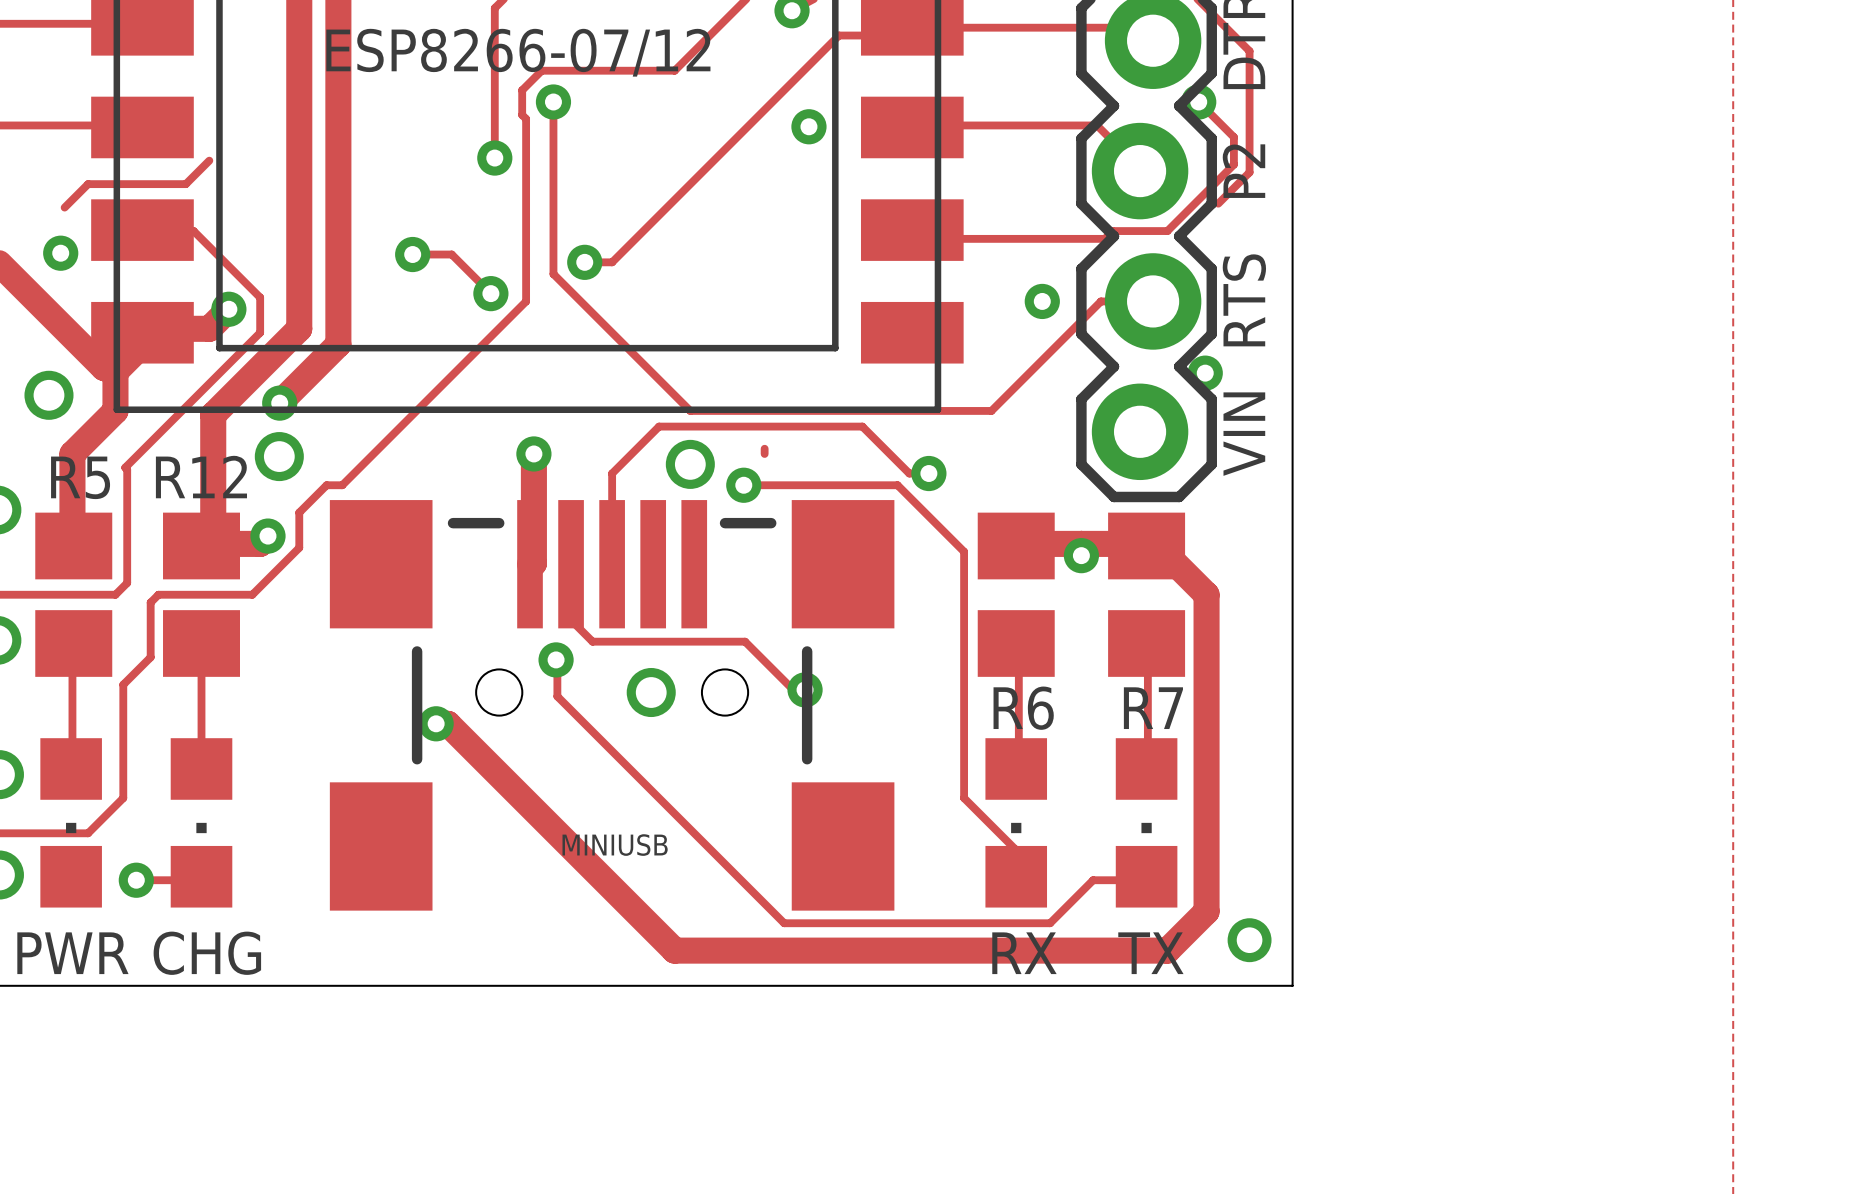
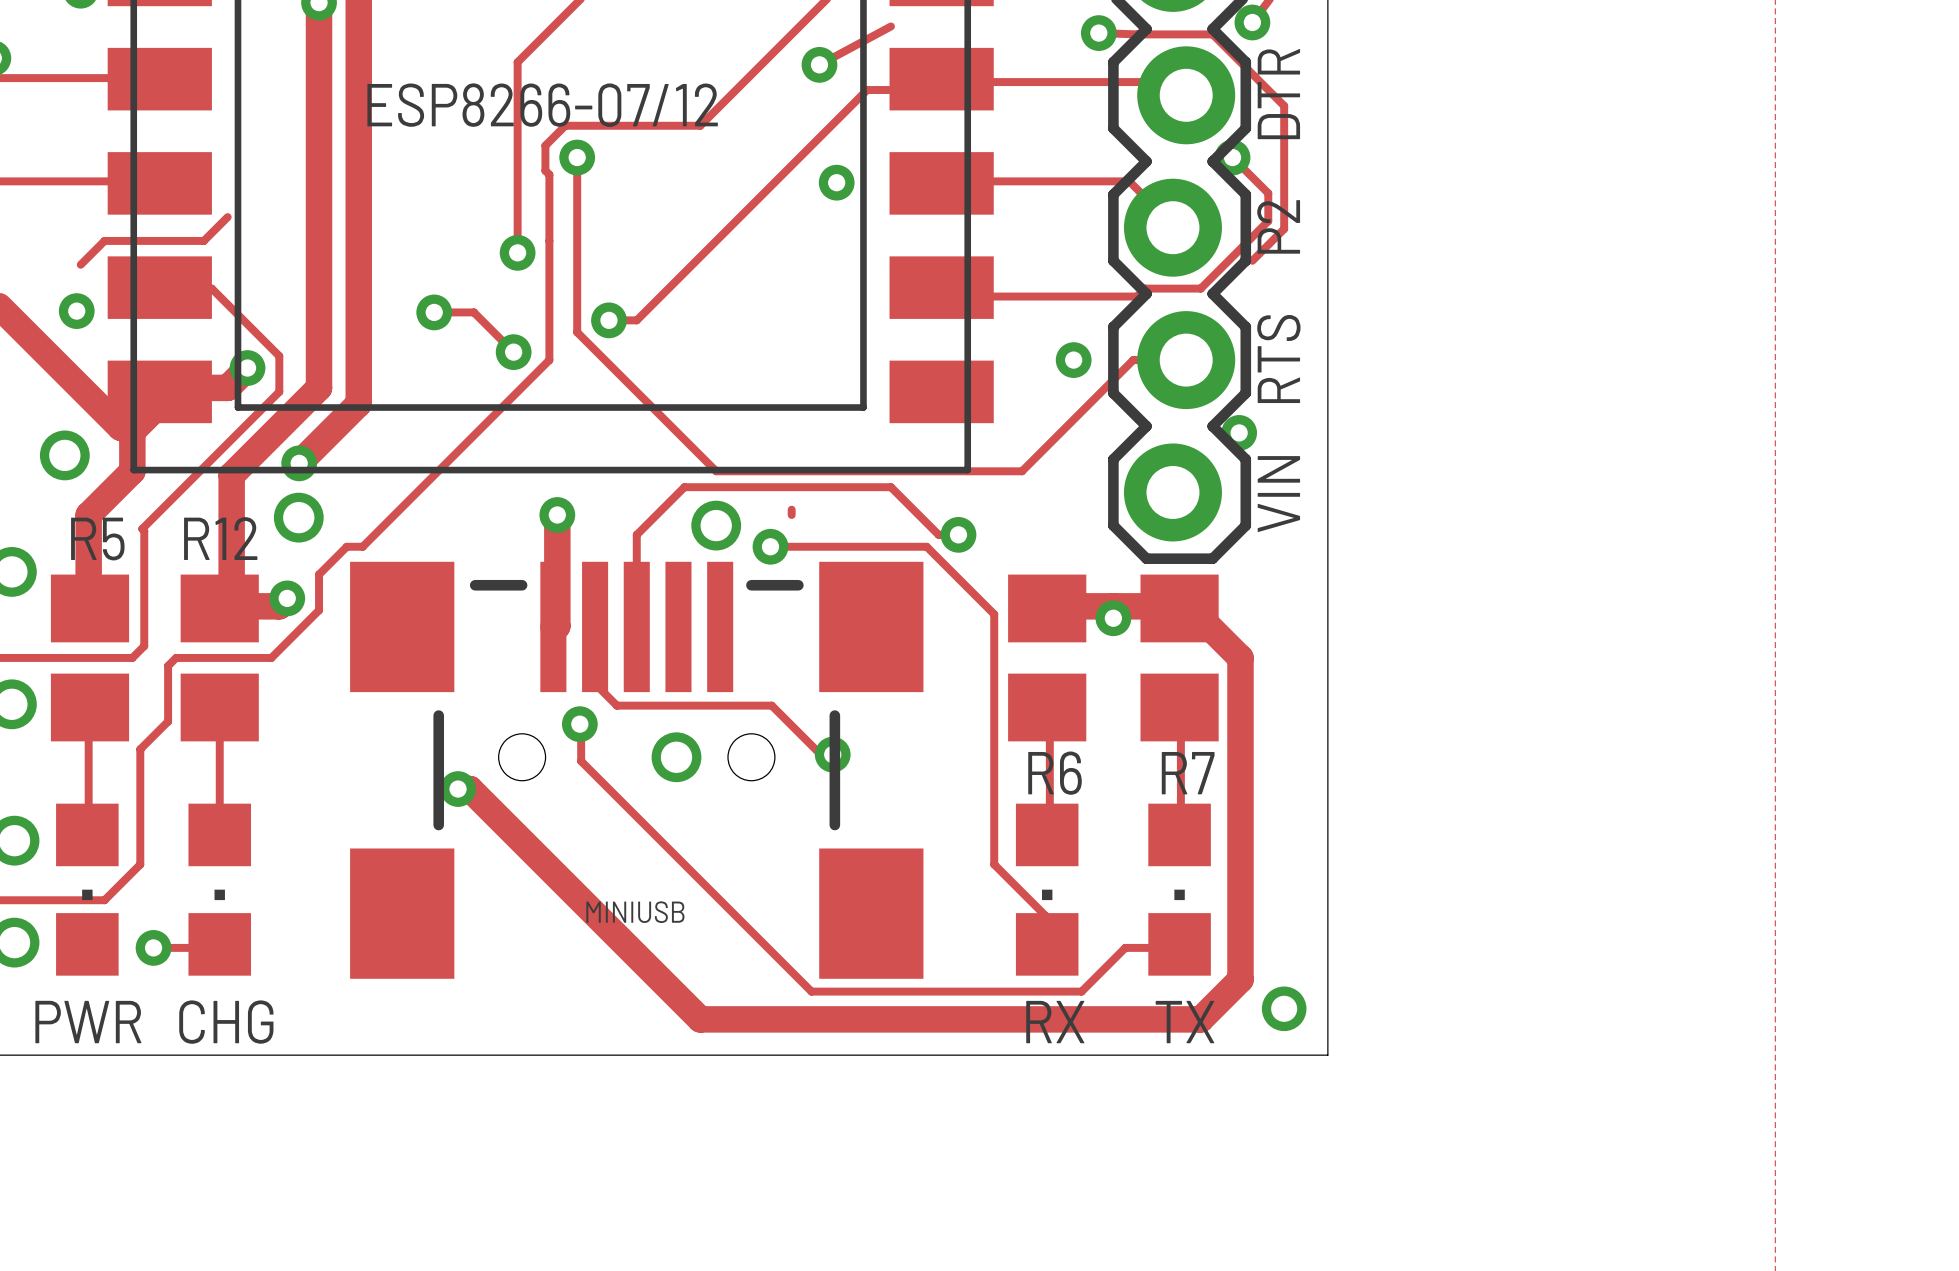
track: none -> (517, 214) (517, 252)
via position: (494, 158) -> (517, 252)

